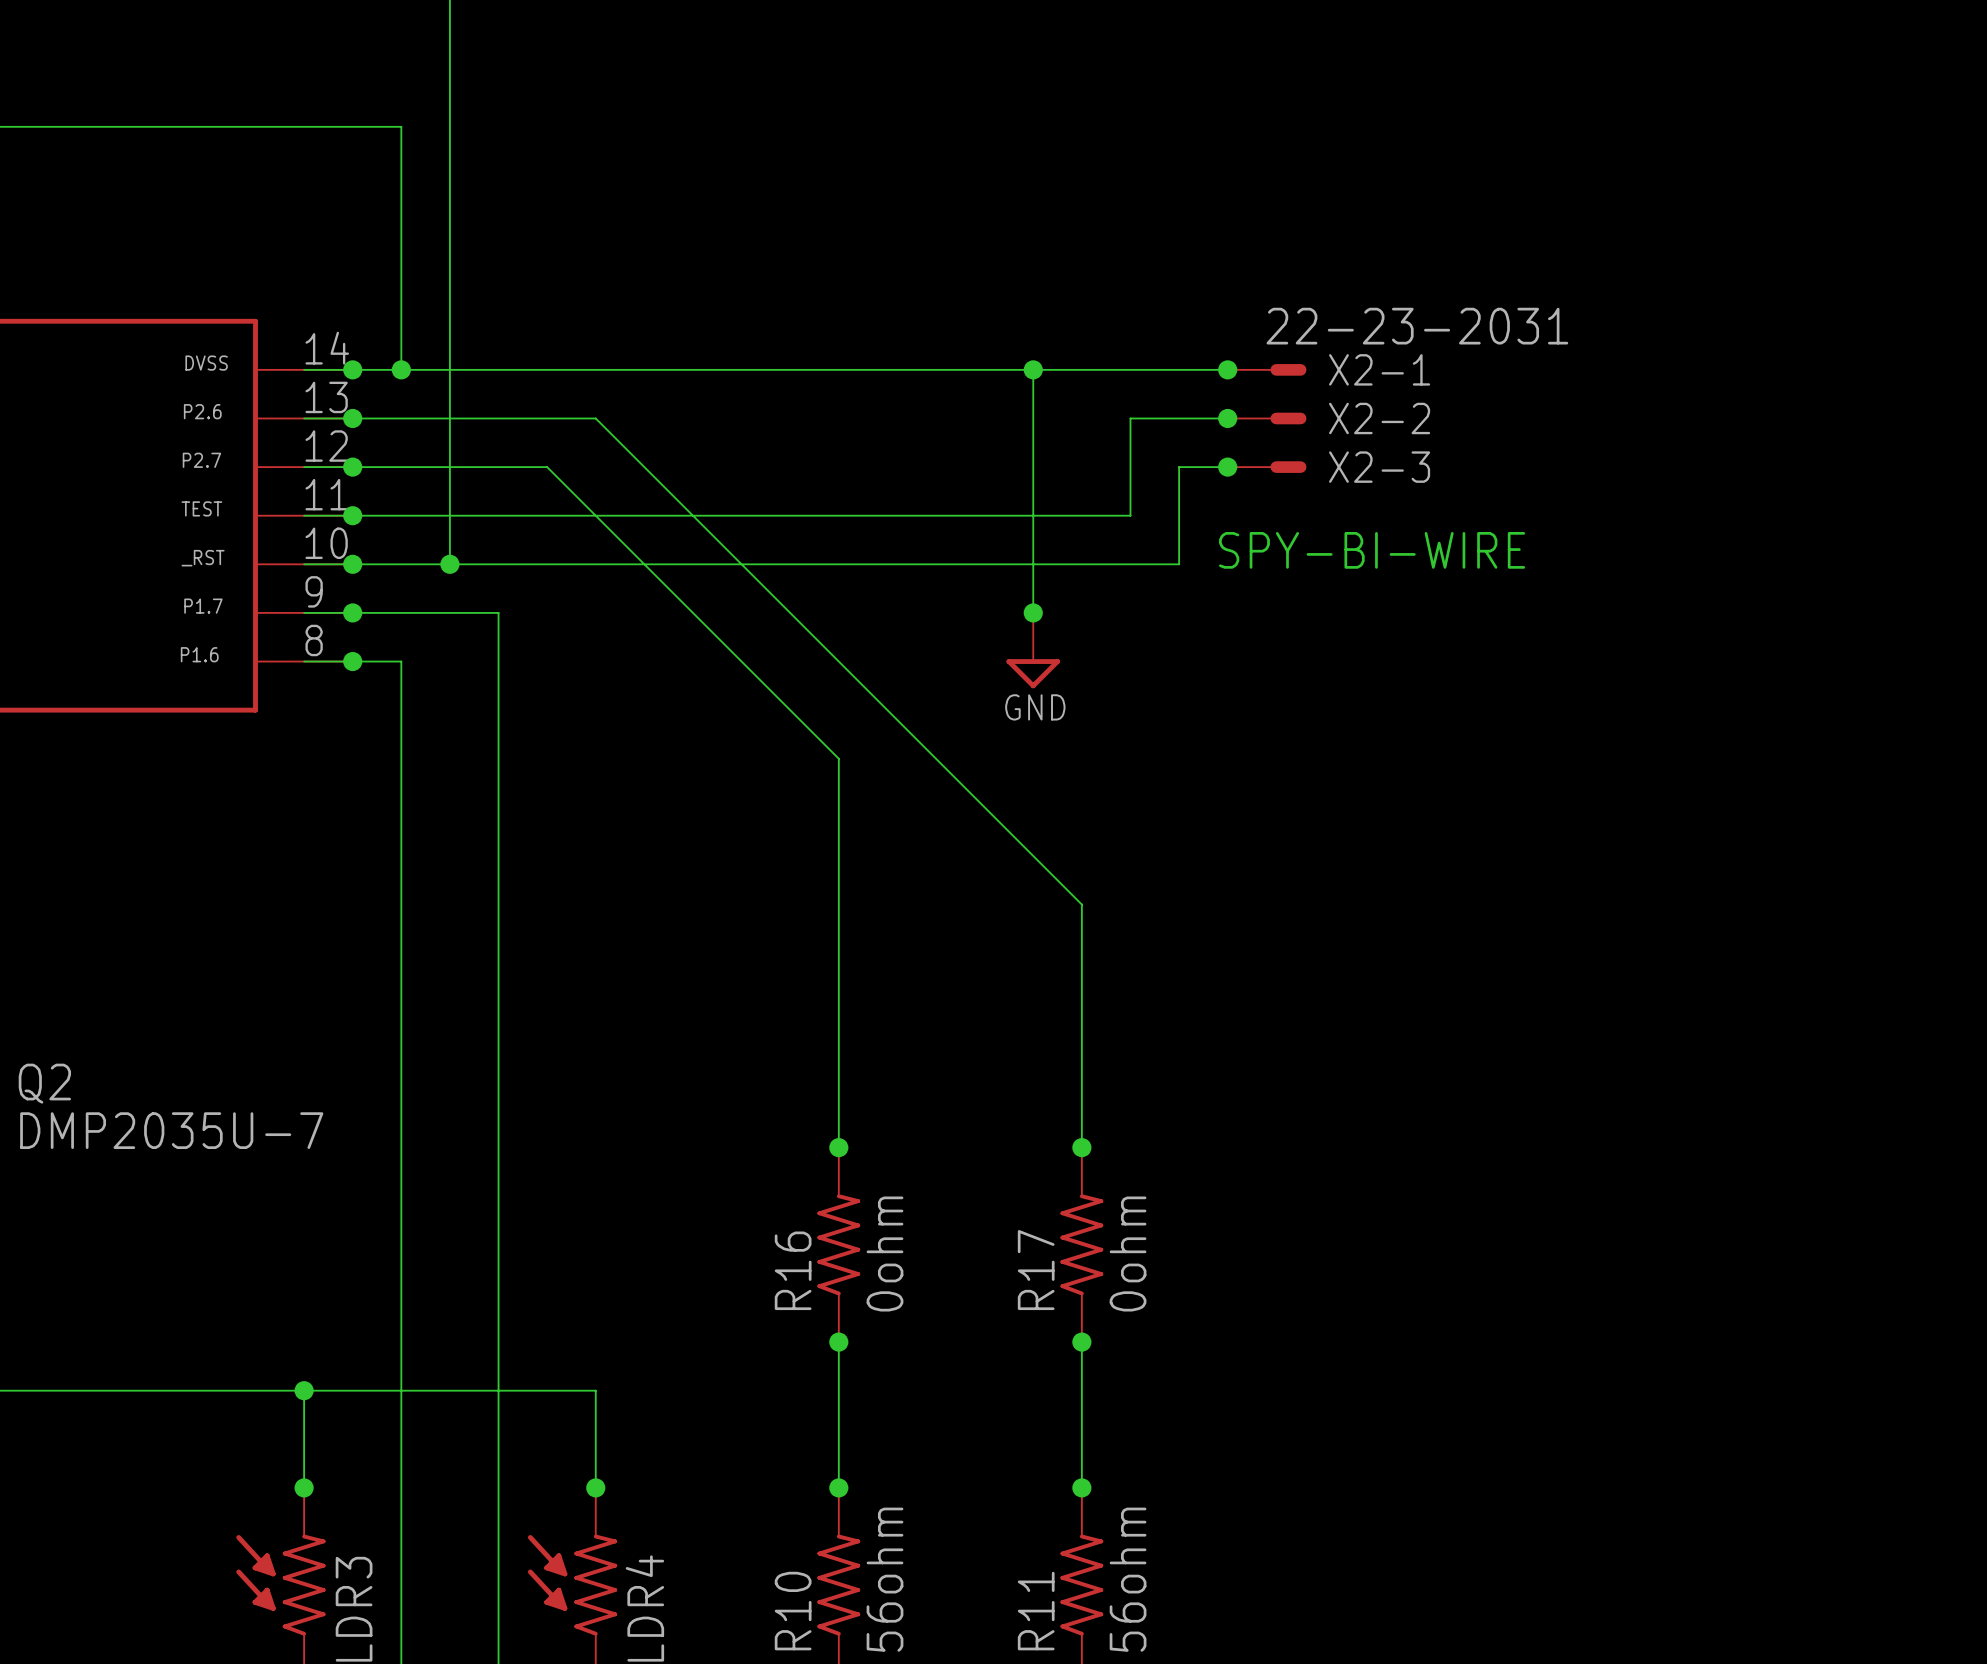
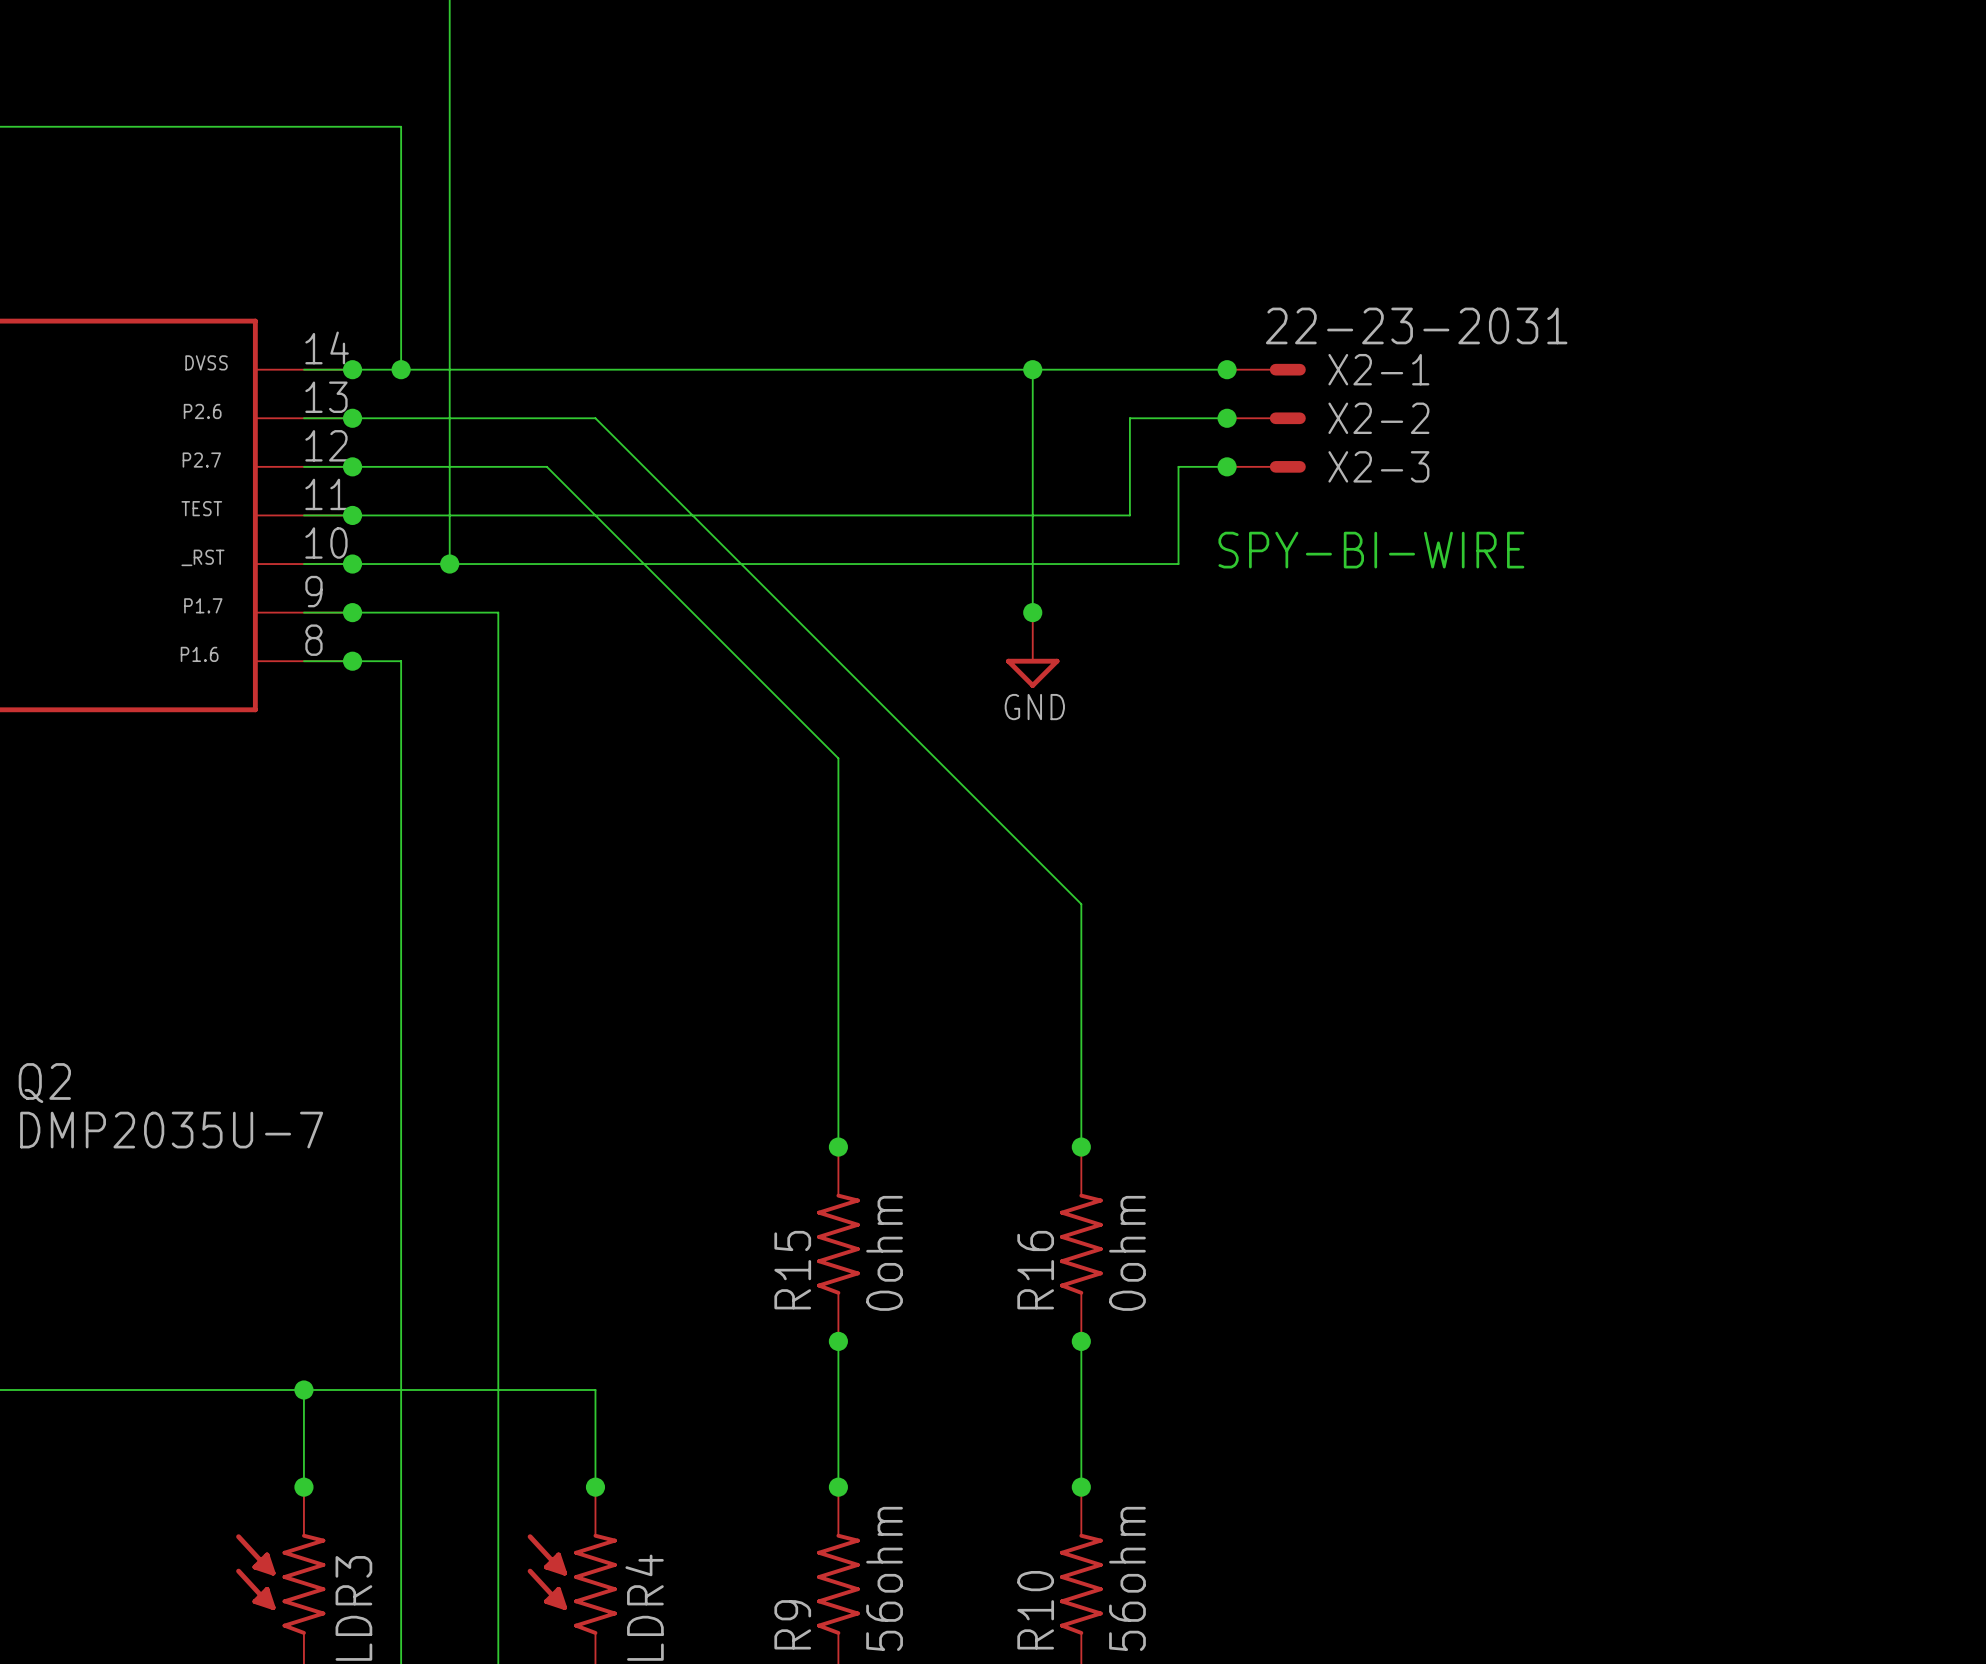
R16 name: R16 (793, 1270) -> R15 (792, 1270)
R17 name: R17 (1036, 1270) -> R16 (1035, 1270)
R10 name: R10 (793, 1611) -> R9 (792, 1624)
R11 name: R11 (1036, 1611) -> R10 (1035, 1610)

